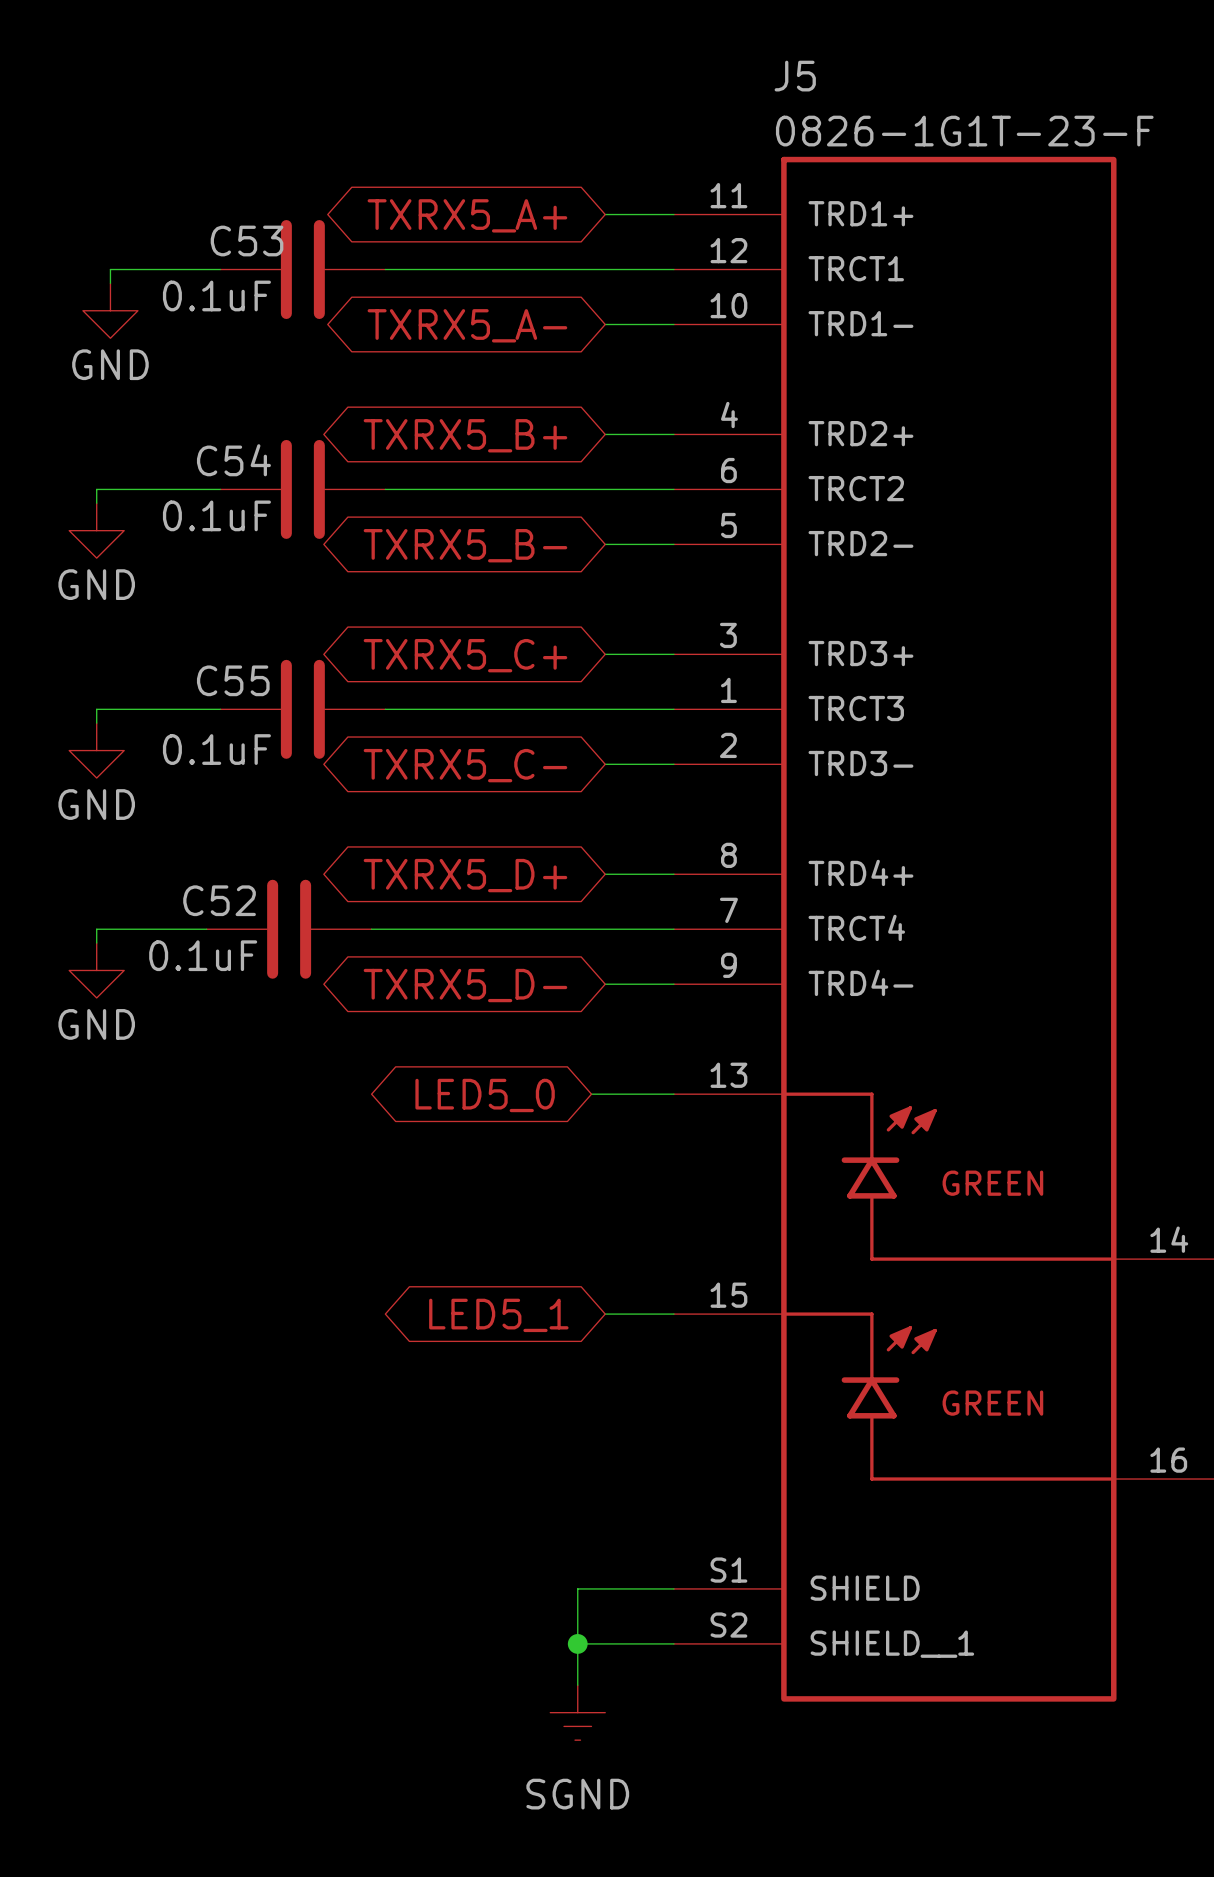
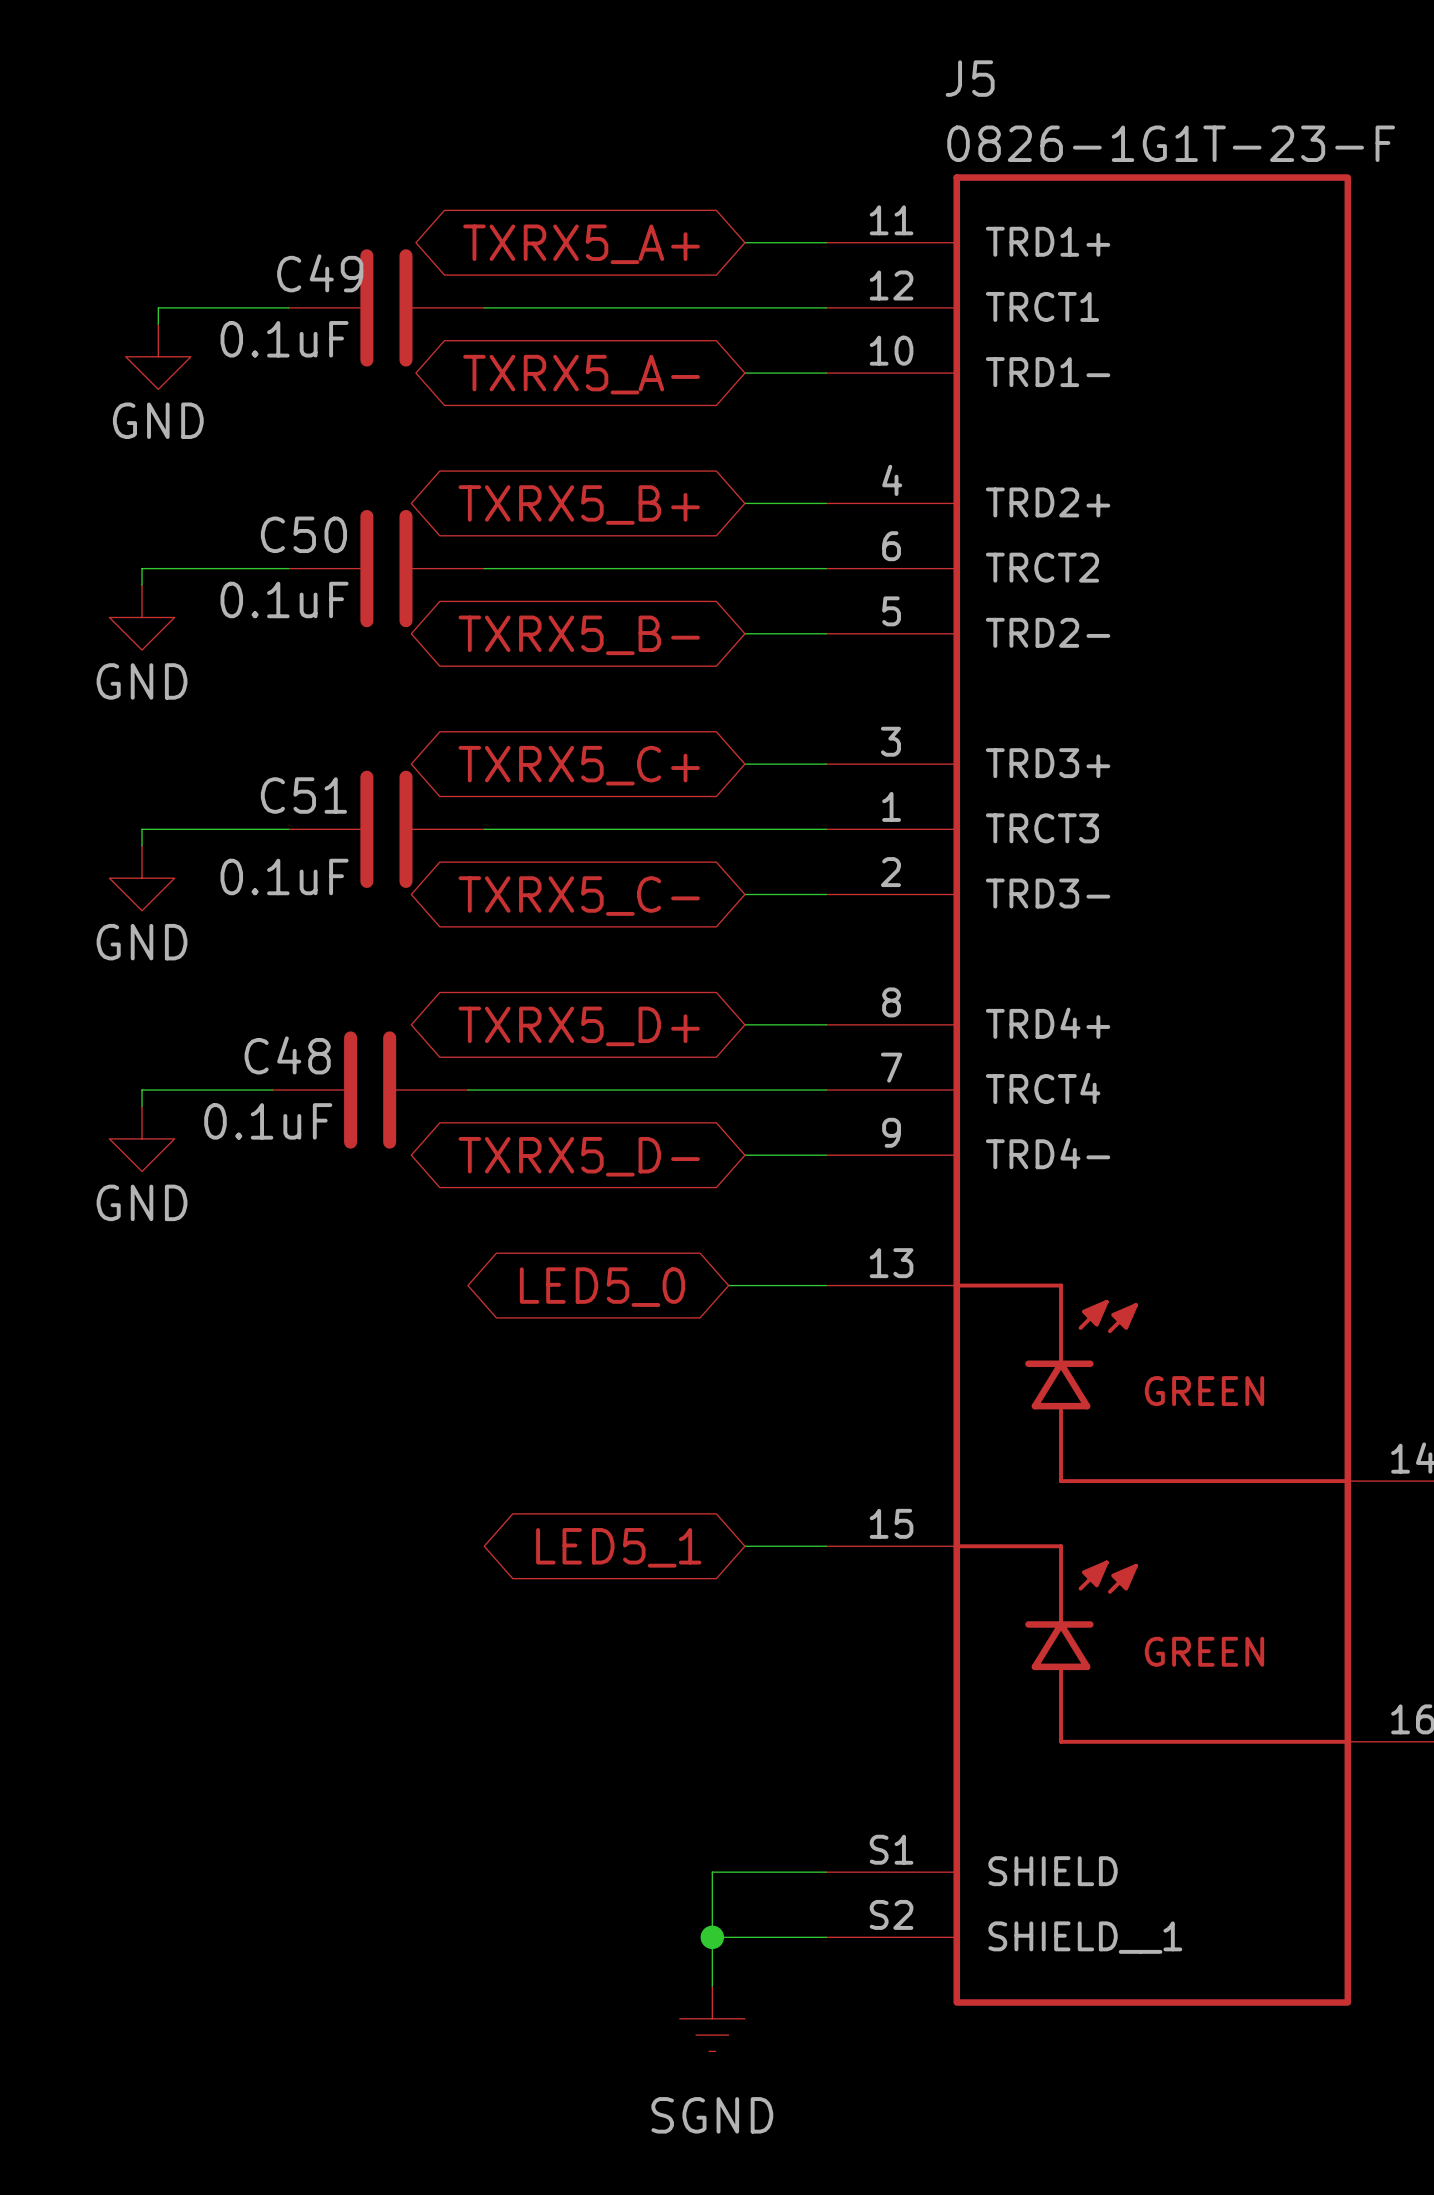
C53 name: C53 (247, 241) -> C49 (320, 273)
C54 name: C54 (233, 460) -> C50 (303, 534)
C55 name: C55 (233, 680) -> C51 (303, 795)
C52 name: C52 (219, 900) -> C48 (287, 1055)

